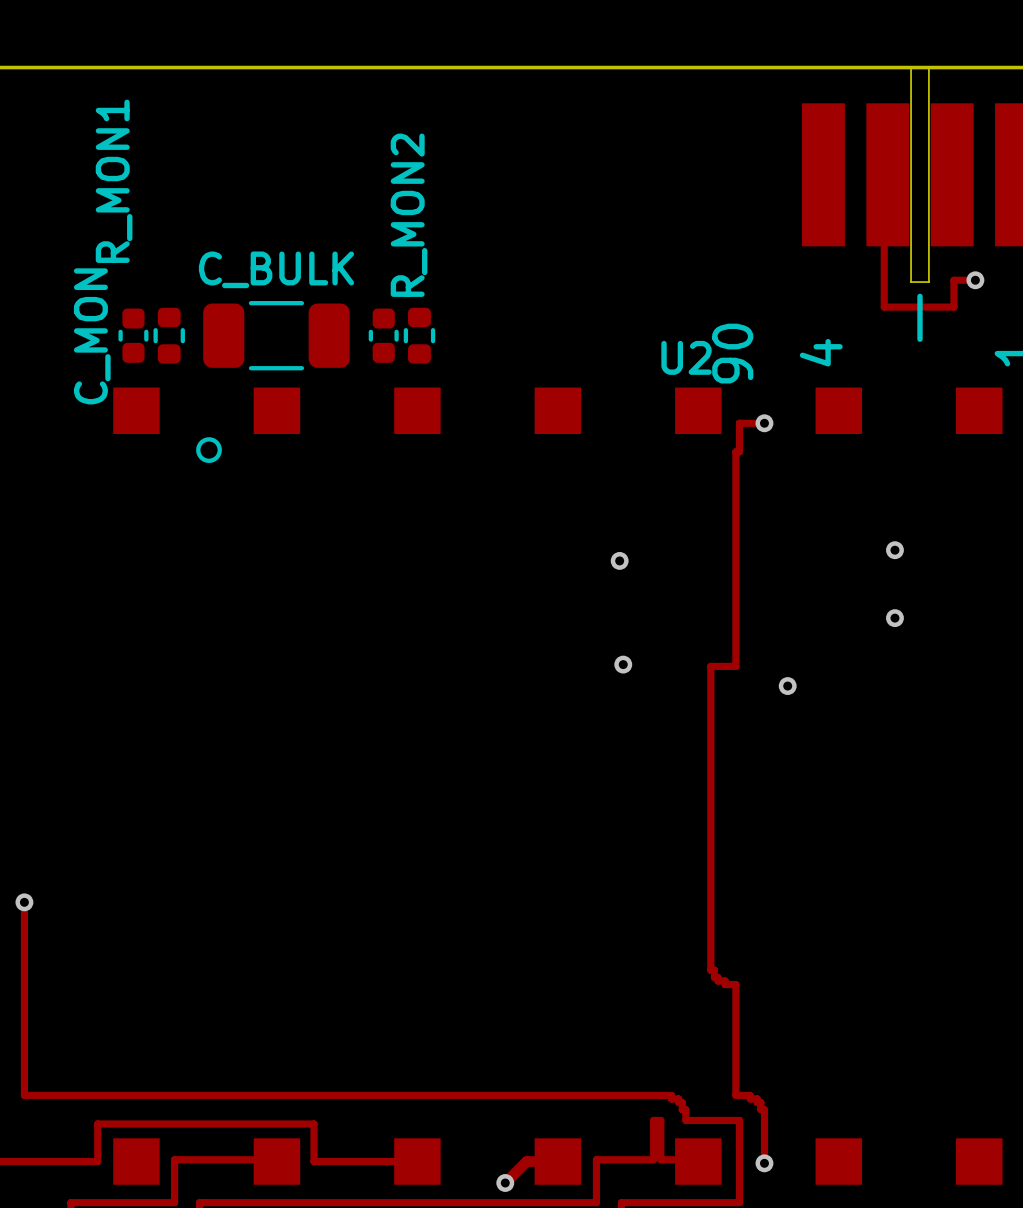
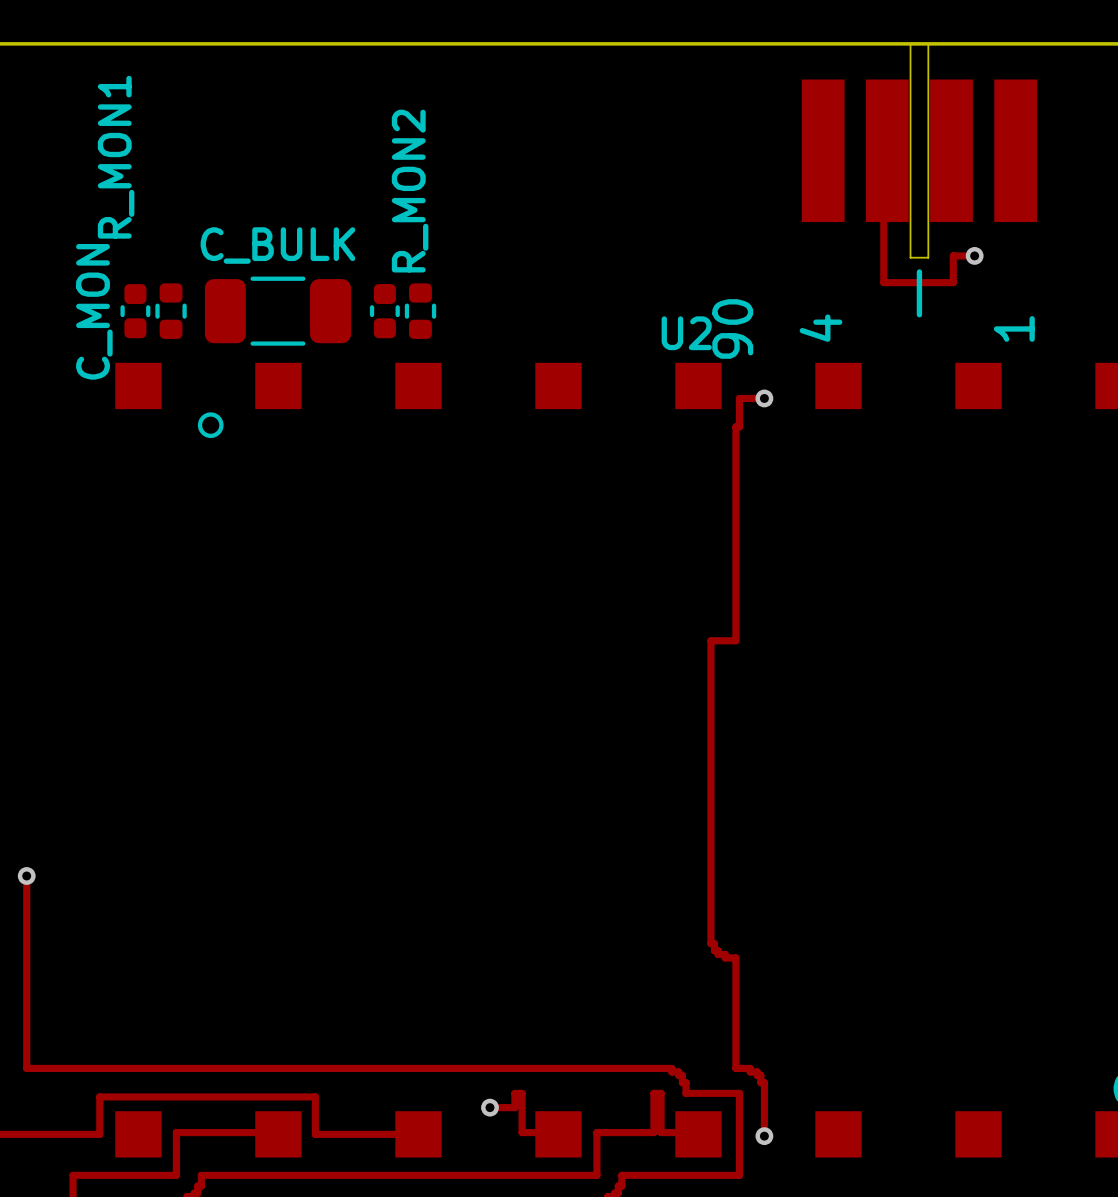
via: (894, 550) -> none
via: (619, 560) -> none
via: (894, 618) -> none
via: (623, 664) -> none
via: (787, 686) -> none
track: none -> (489, 1107) (514, 1107) (514, 1093) (522, 1093) (522, 1132) (557, 1132)
track: (558, 1161) (526, 1161) (505, 1182) -> none
via position: (505, 1182) -> (489, 1107)

